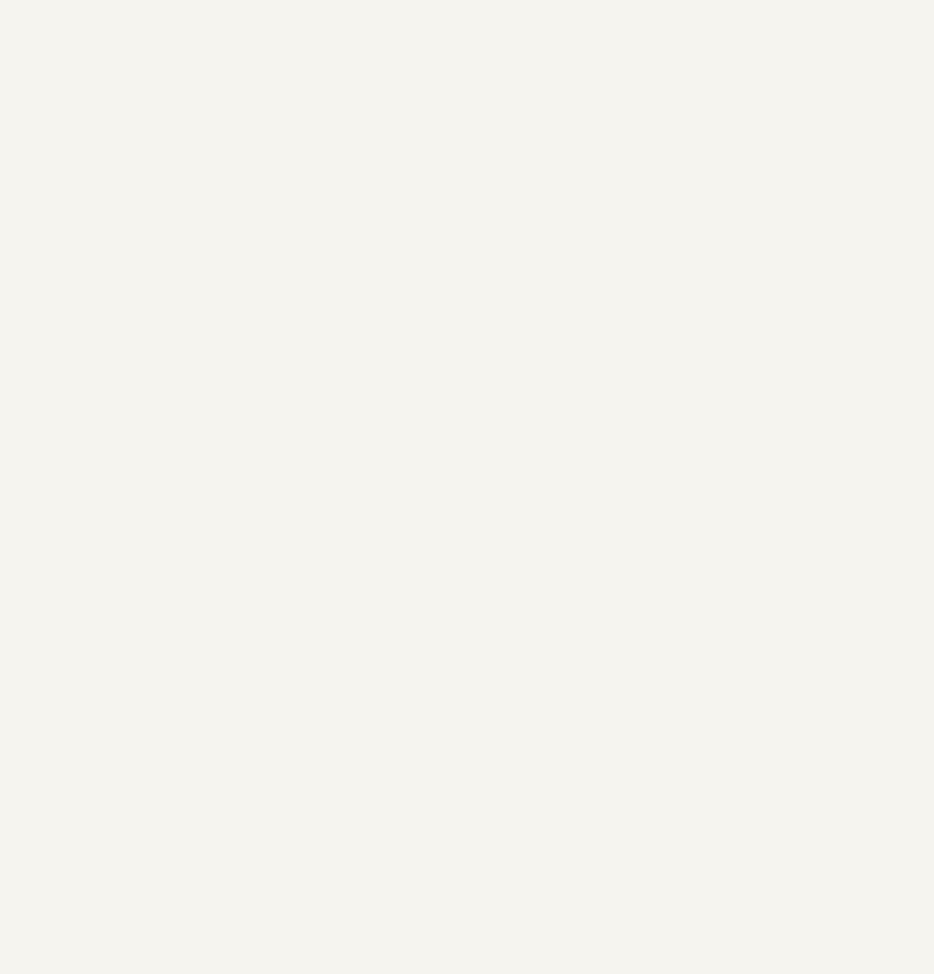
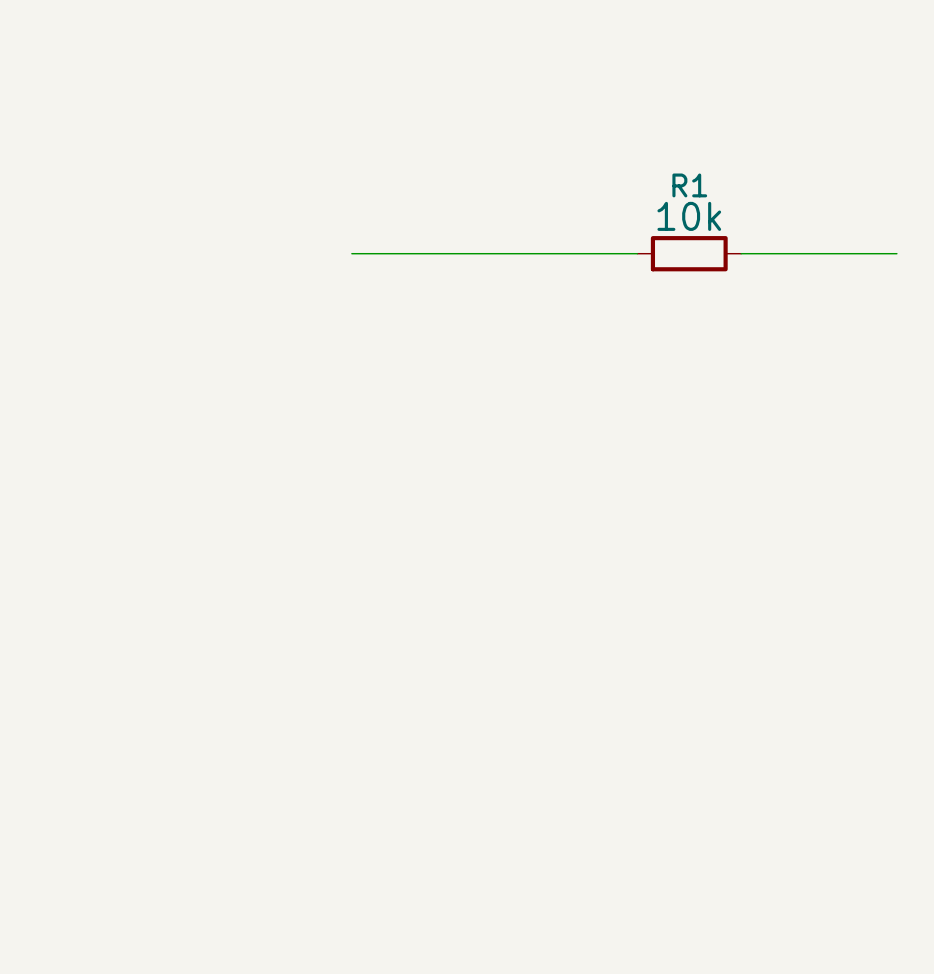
wire: none -> (351, 253) (637, 253)
R1: none -> 10k (689, 253)
wire: none -> (741, 253) (896, 253)

